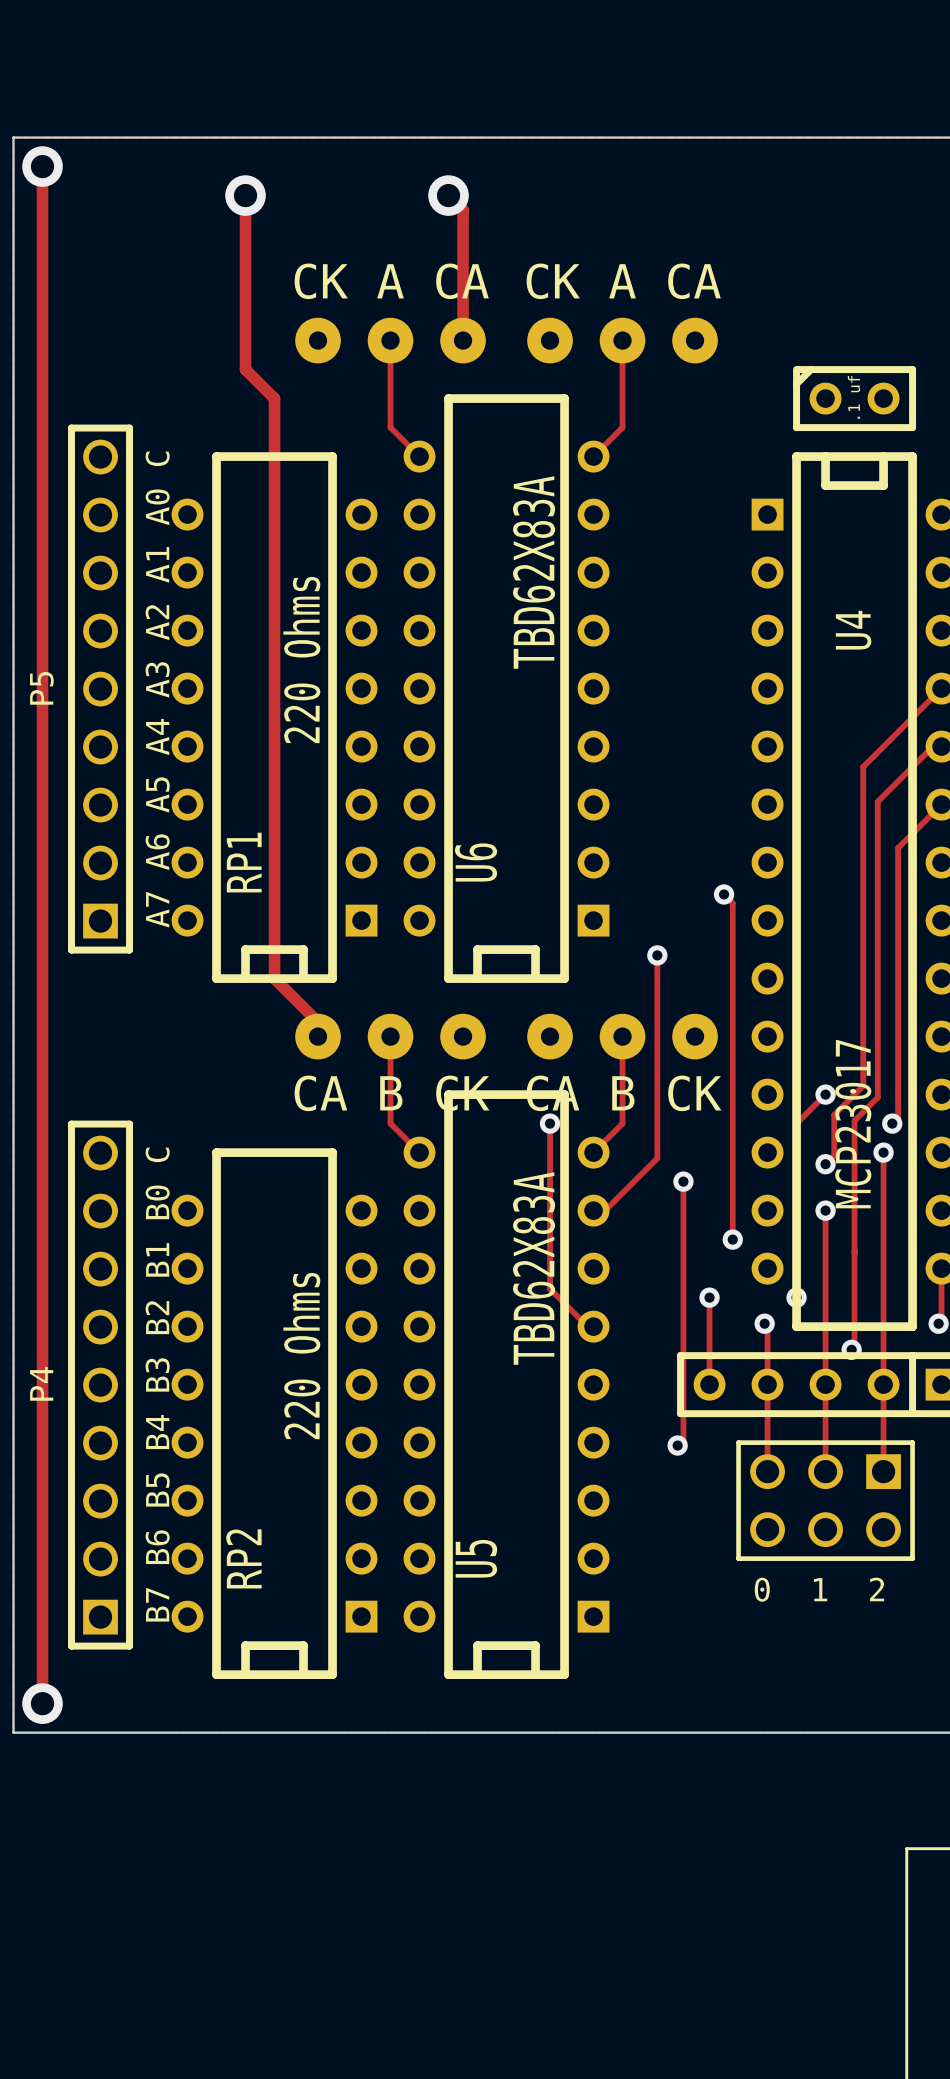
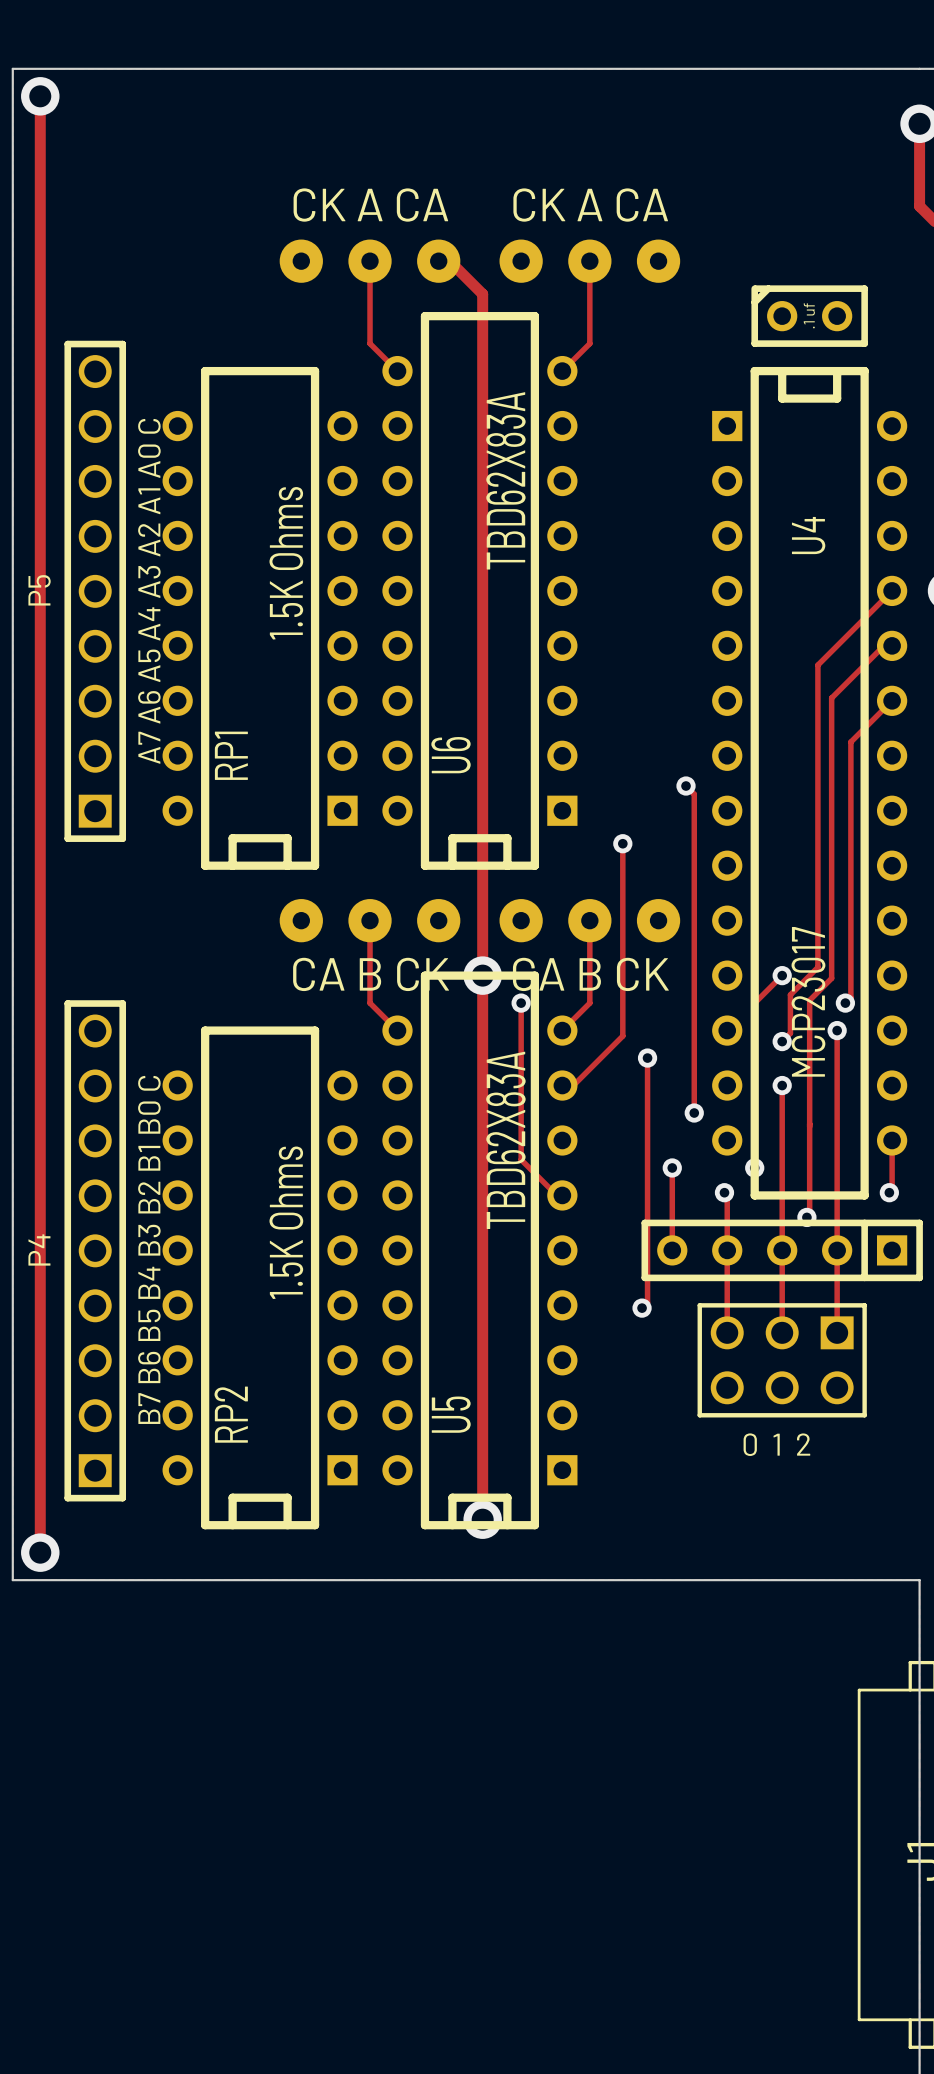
track: (245, 195) (245, 369) (274, 398) (274, 978) (318, 1022) (318, 1036) -> none
via: (245, 195) -> none
track: (448, 195) (463, 210) (463, 340) -> (482, 1519) (482, 294) (449, 261) (438, 261)
via: (448, 195) -> none
RP1 value: 220 Ohms (301, 660) -> 1.5K Ohms (286, 563)
via: none -> (482, 975)
RP2 value: 220 Ohms (301, 1356) -> 1.5K Ohms (286, 1222)
via: none -> (482, 1519)

